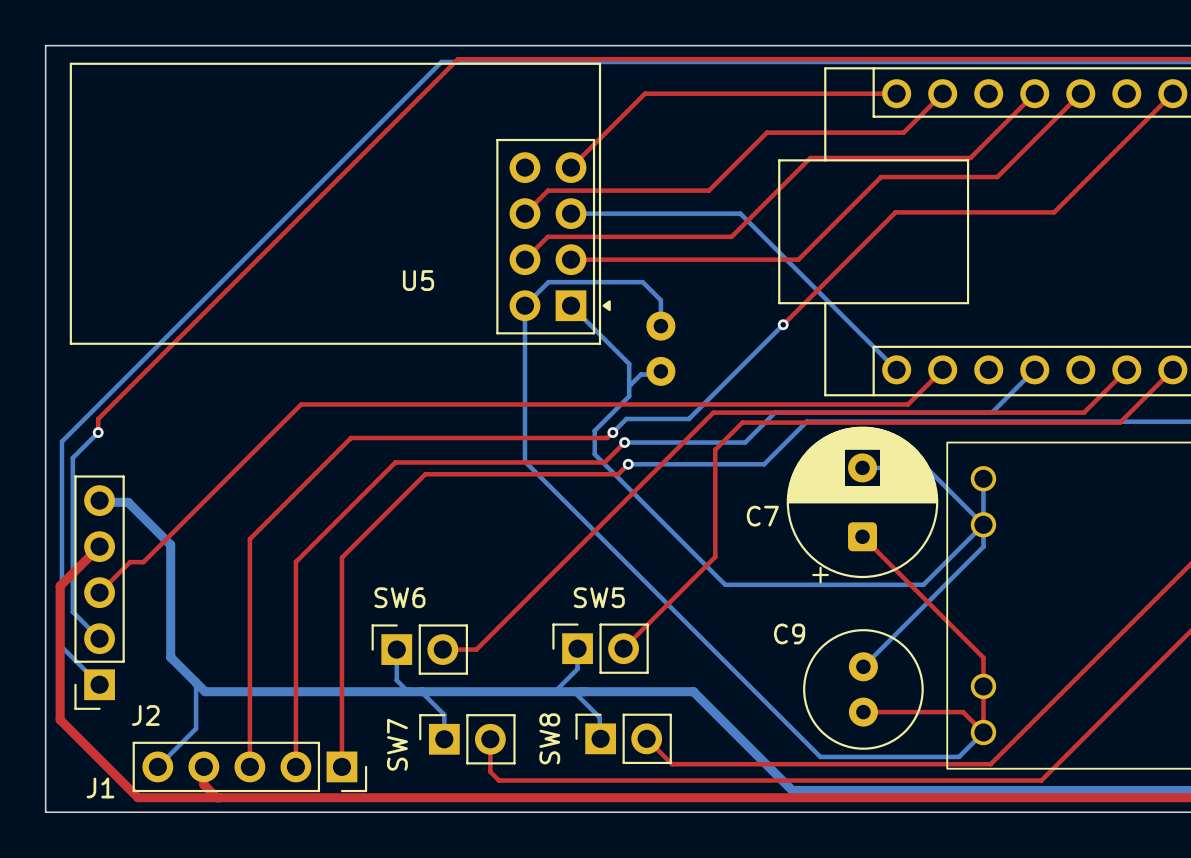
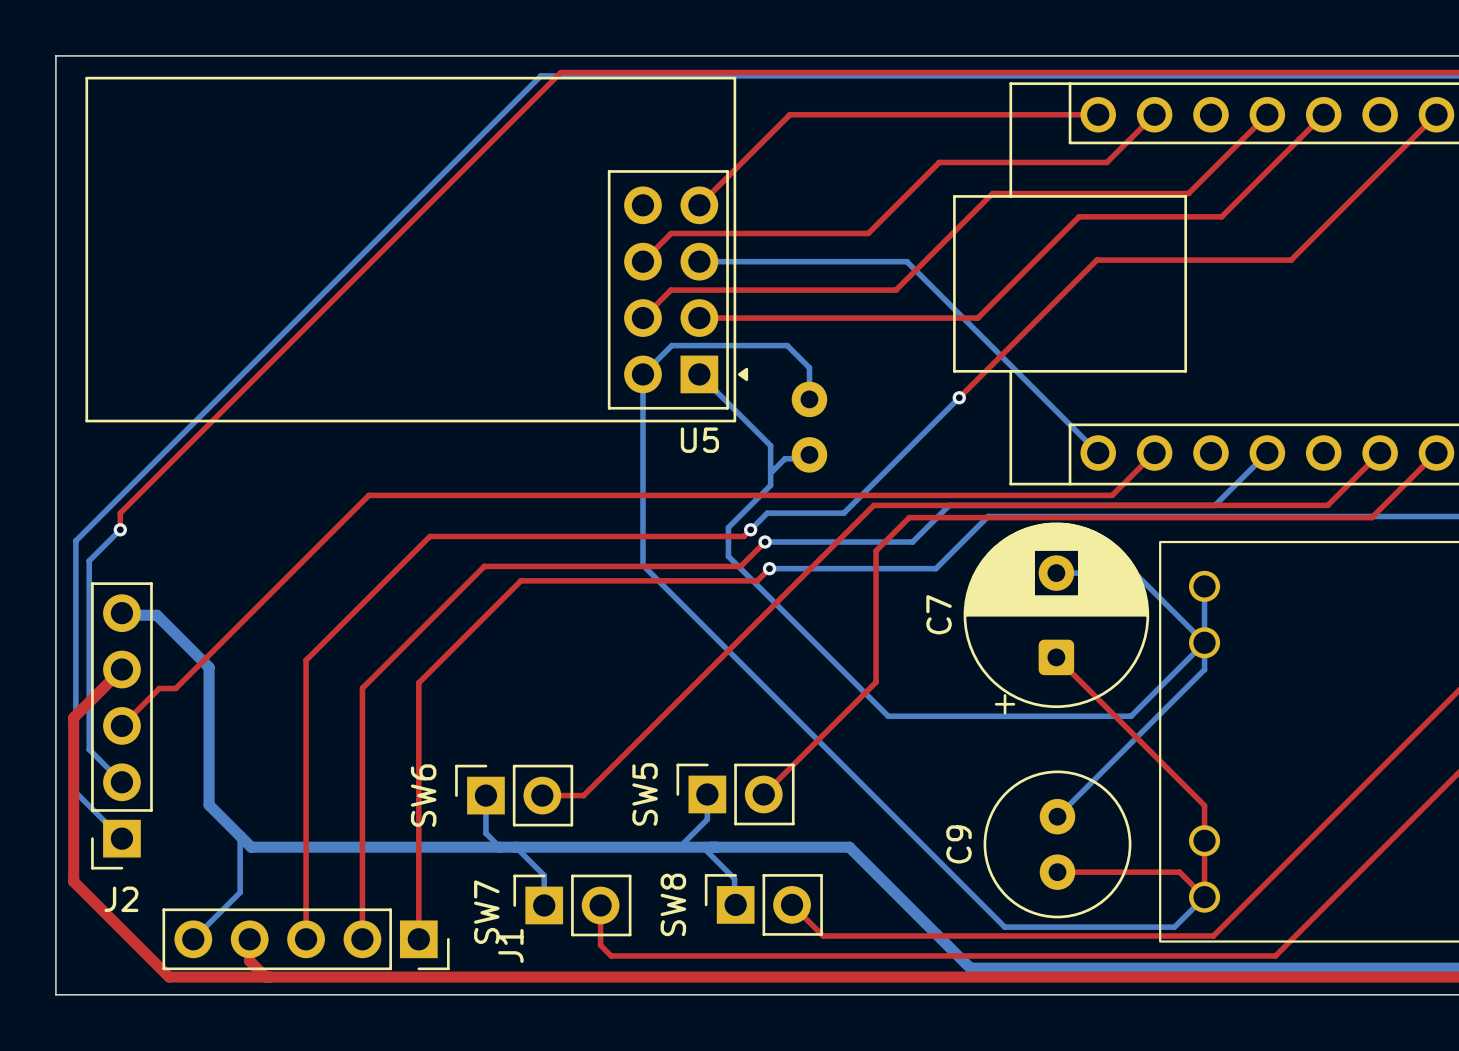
U5 name position: U5 (418, 280) -> U5 (699, 440)
C7 name rotation: 0° (762, 516) -> 90° counterclockwise (939, 614)
SW6 name rotation: 0° (399, 597) -> 90° counterclockwise (423, 795)
SW6 name position: SW6 (399, 597) -> SW6 (423, 795)
SW5 name rotation: 0° (599, 597) -> 90° counterclockwise (645, 794)
SW5 name position: SW5 (599, 597) -> SW5 (645, 794)
C9 name rotation: 0° (789, 633) -> 90° counterclockwise (959, 844)
C9 name position: C9 (789, 633) -> C9 (959, 844)
J2 name position: J2 (145, 715) -> J2 (121, 899)
J1 name rotation: 0° (100, 787) -> 90° counterclockwise (510, 945)
J1 name position: J1 (100, 787) -> J1 (510, 945)

